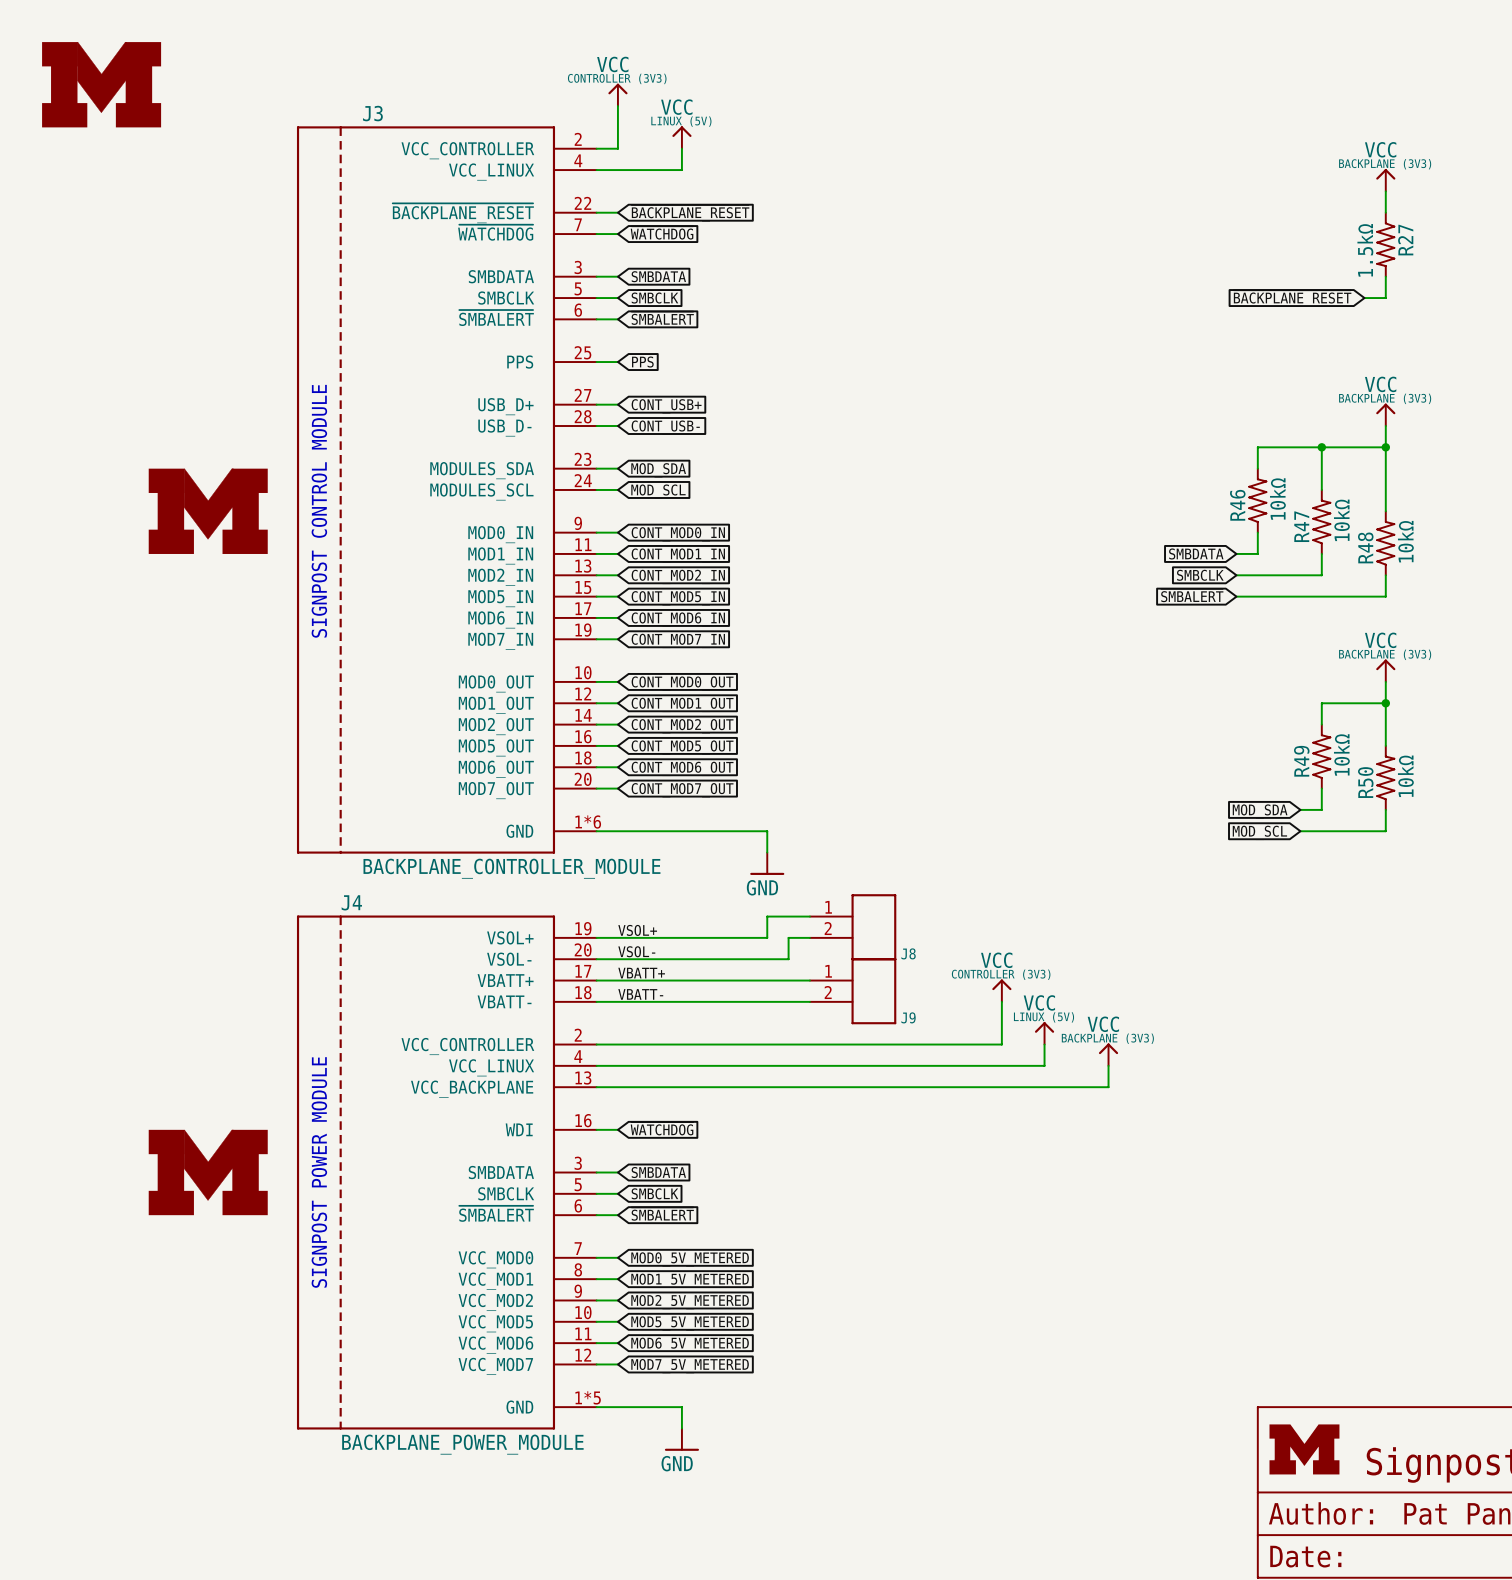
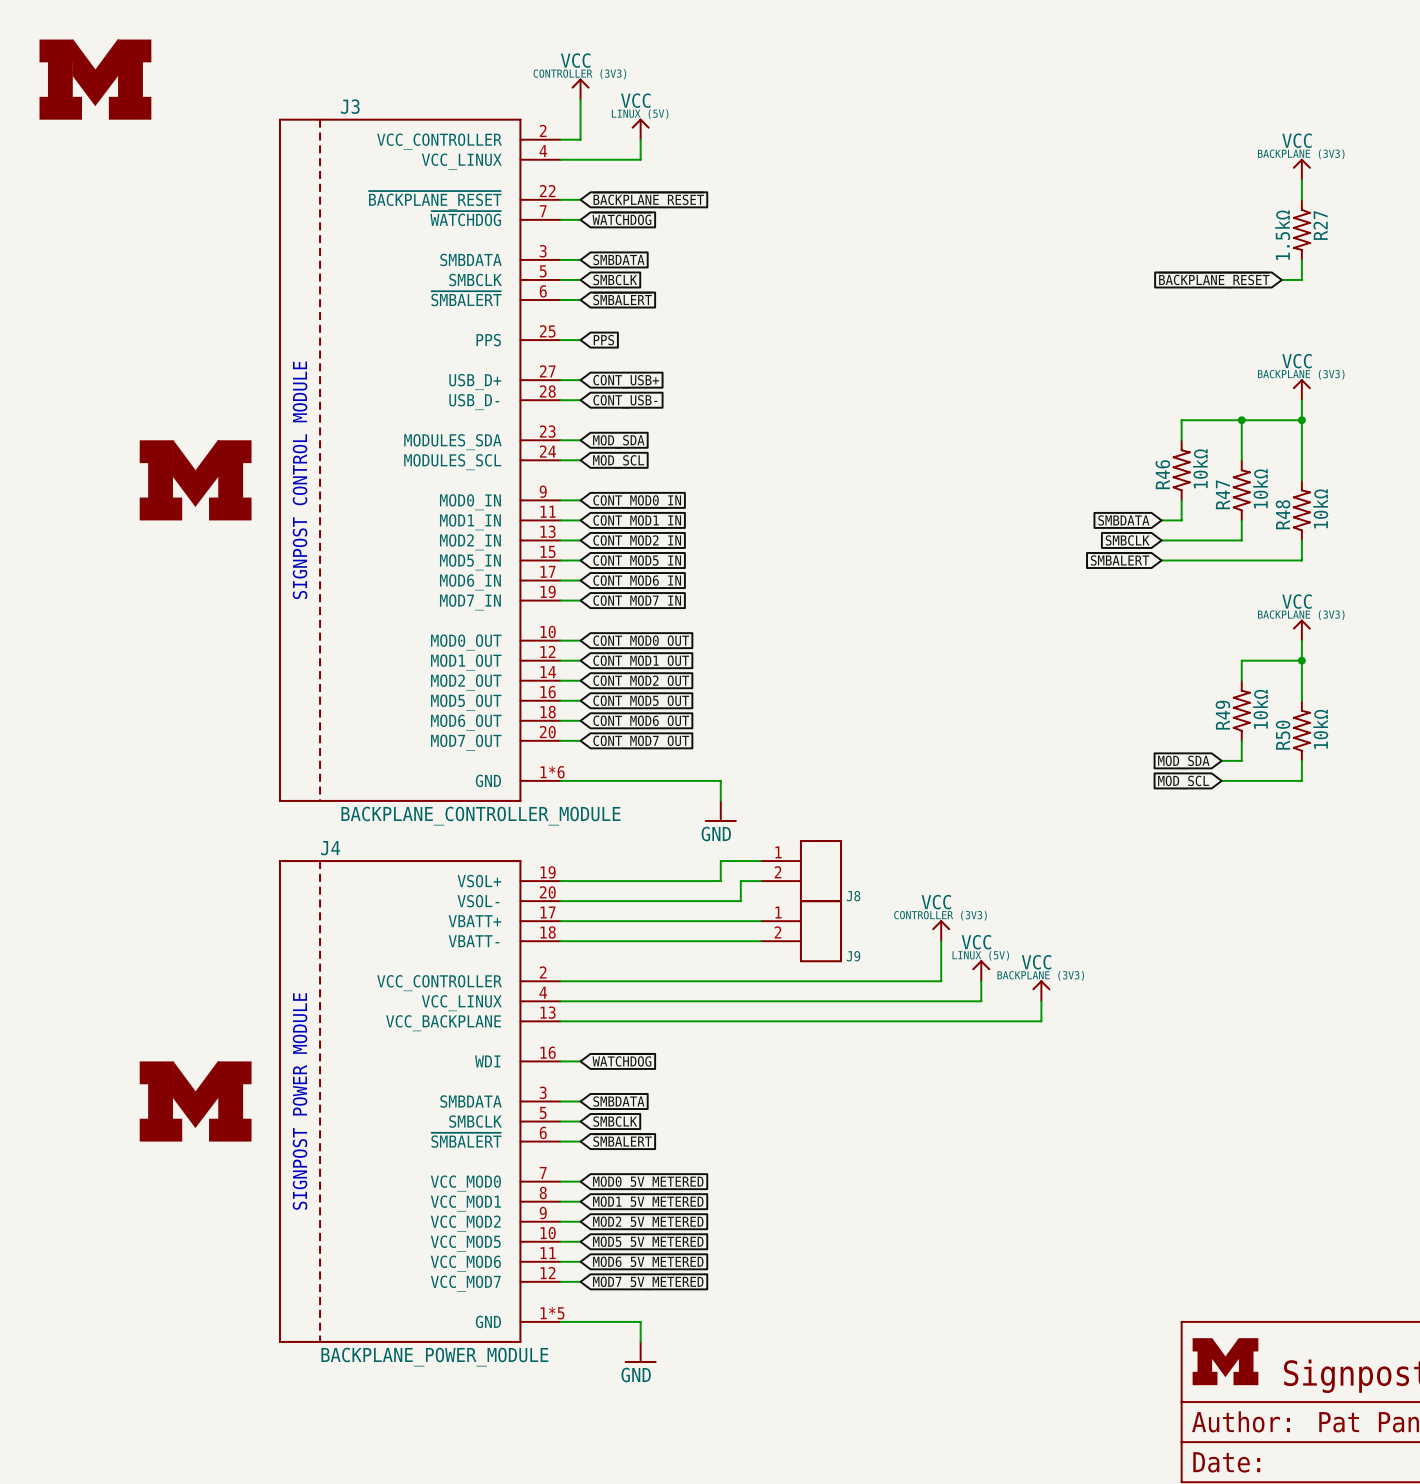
label: VSOL+ (637, 930) -> none
label: VSOL- (636, 951) -> none
label: VBATT+ (641, 973) -> none
label: VBATT- (640, 994) -> none

